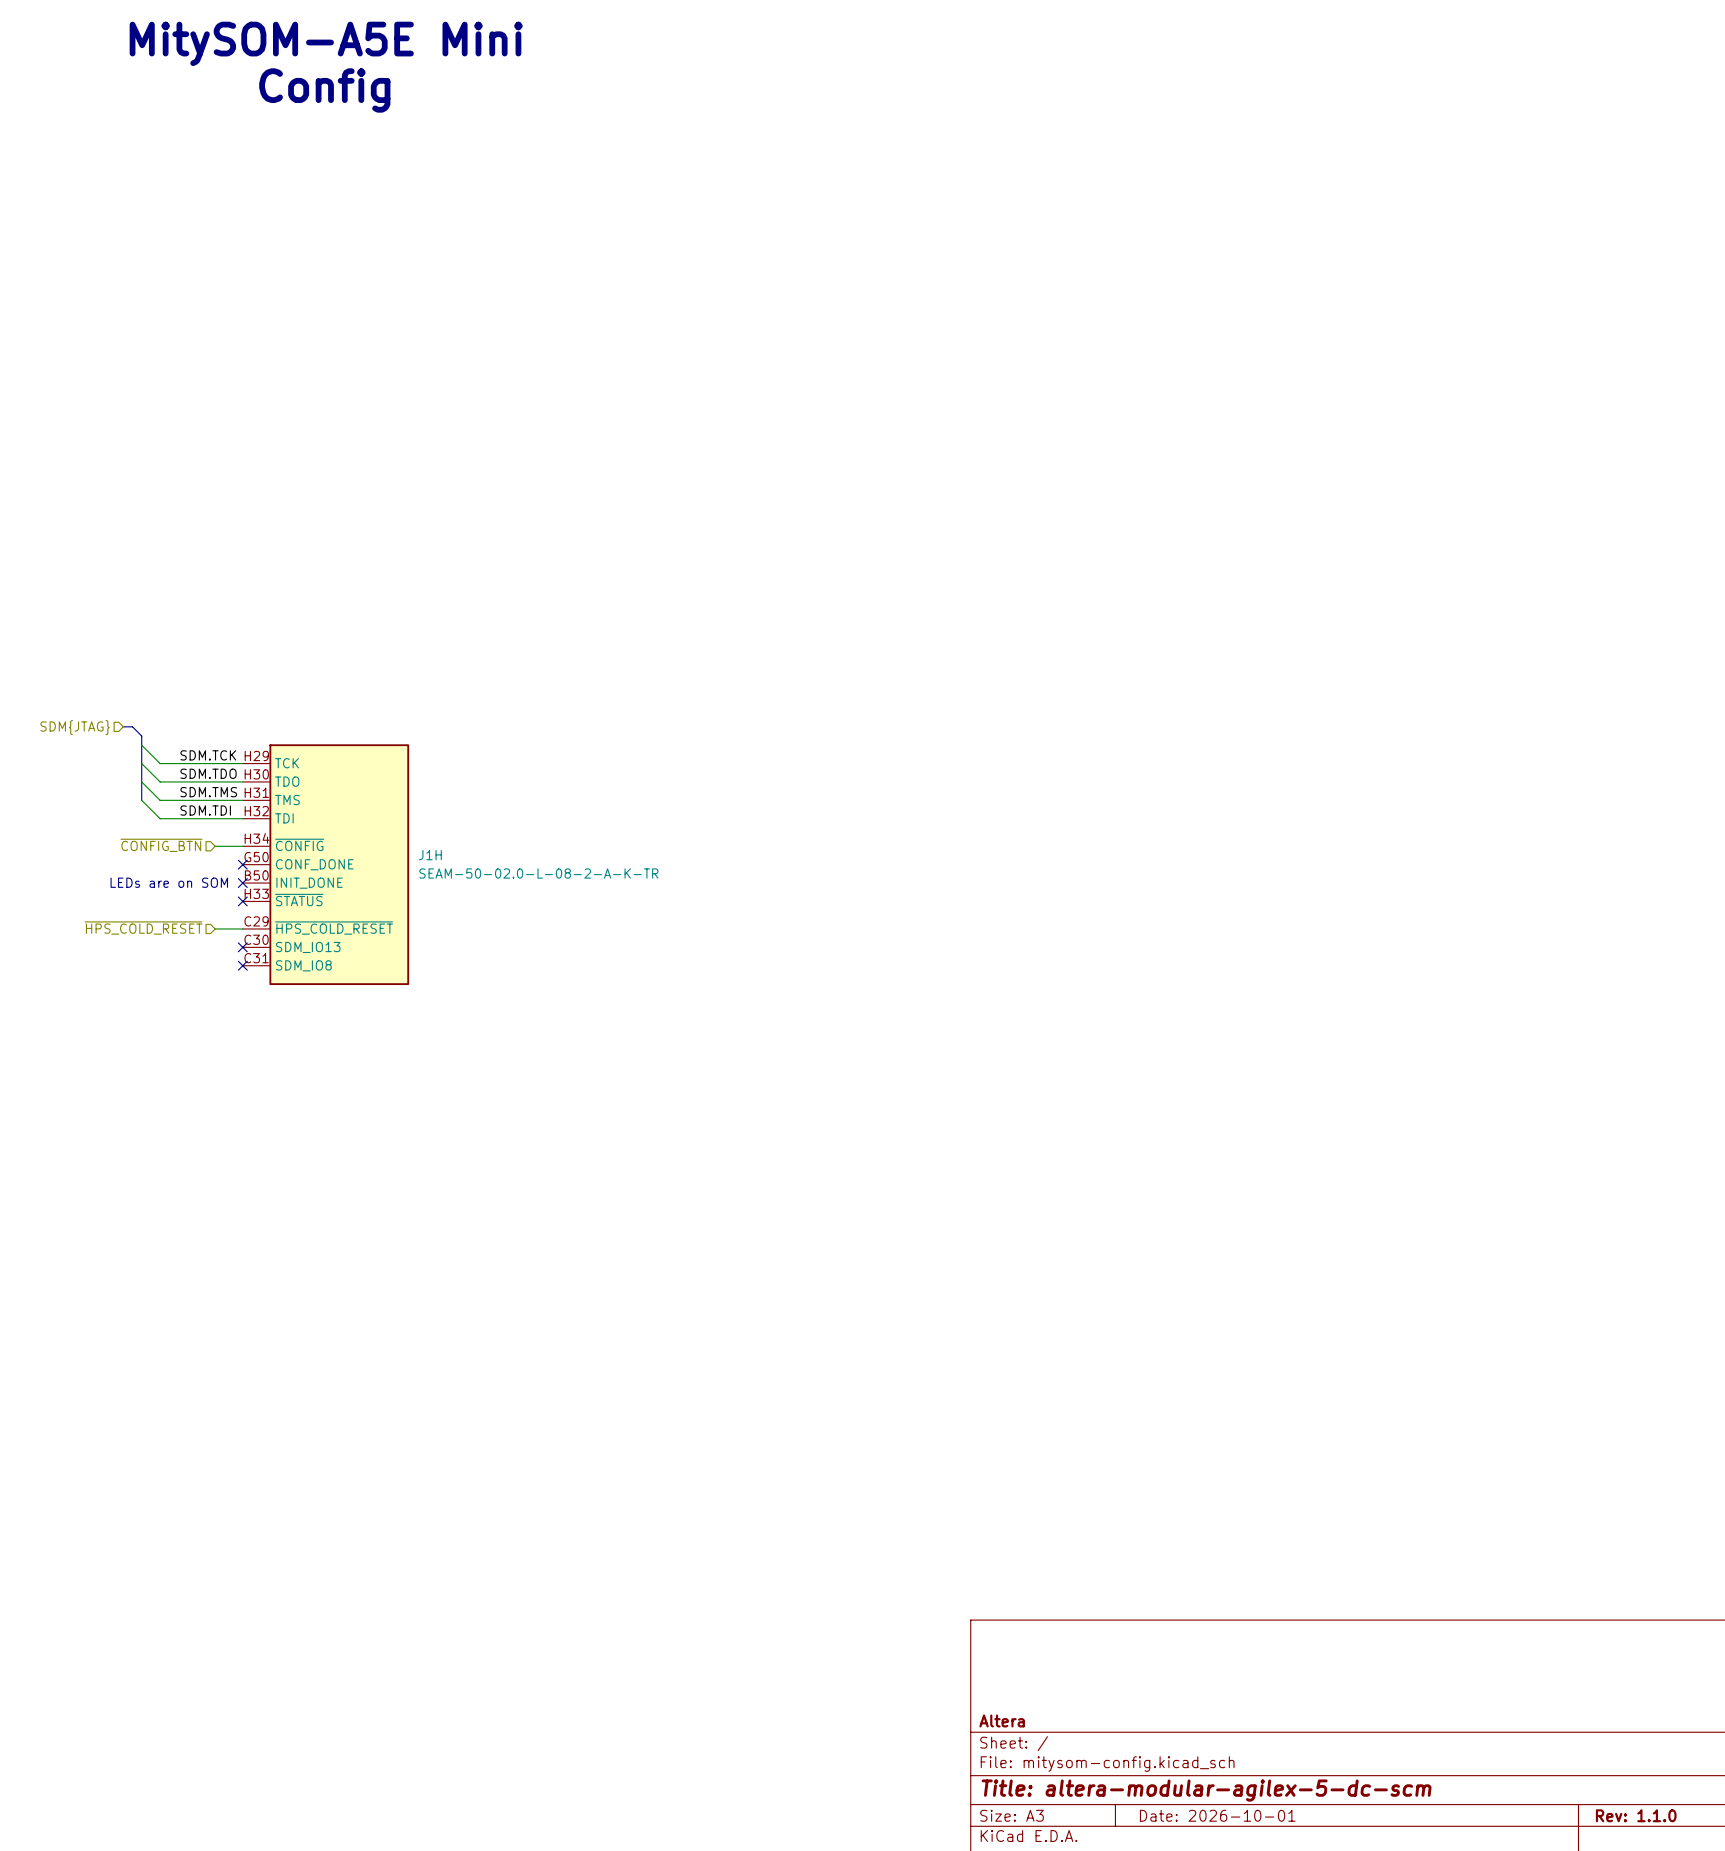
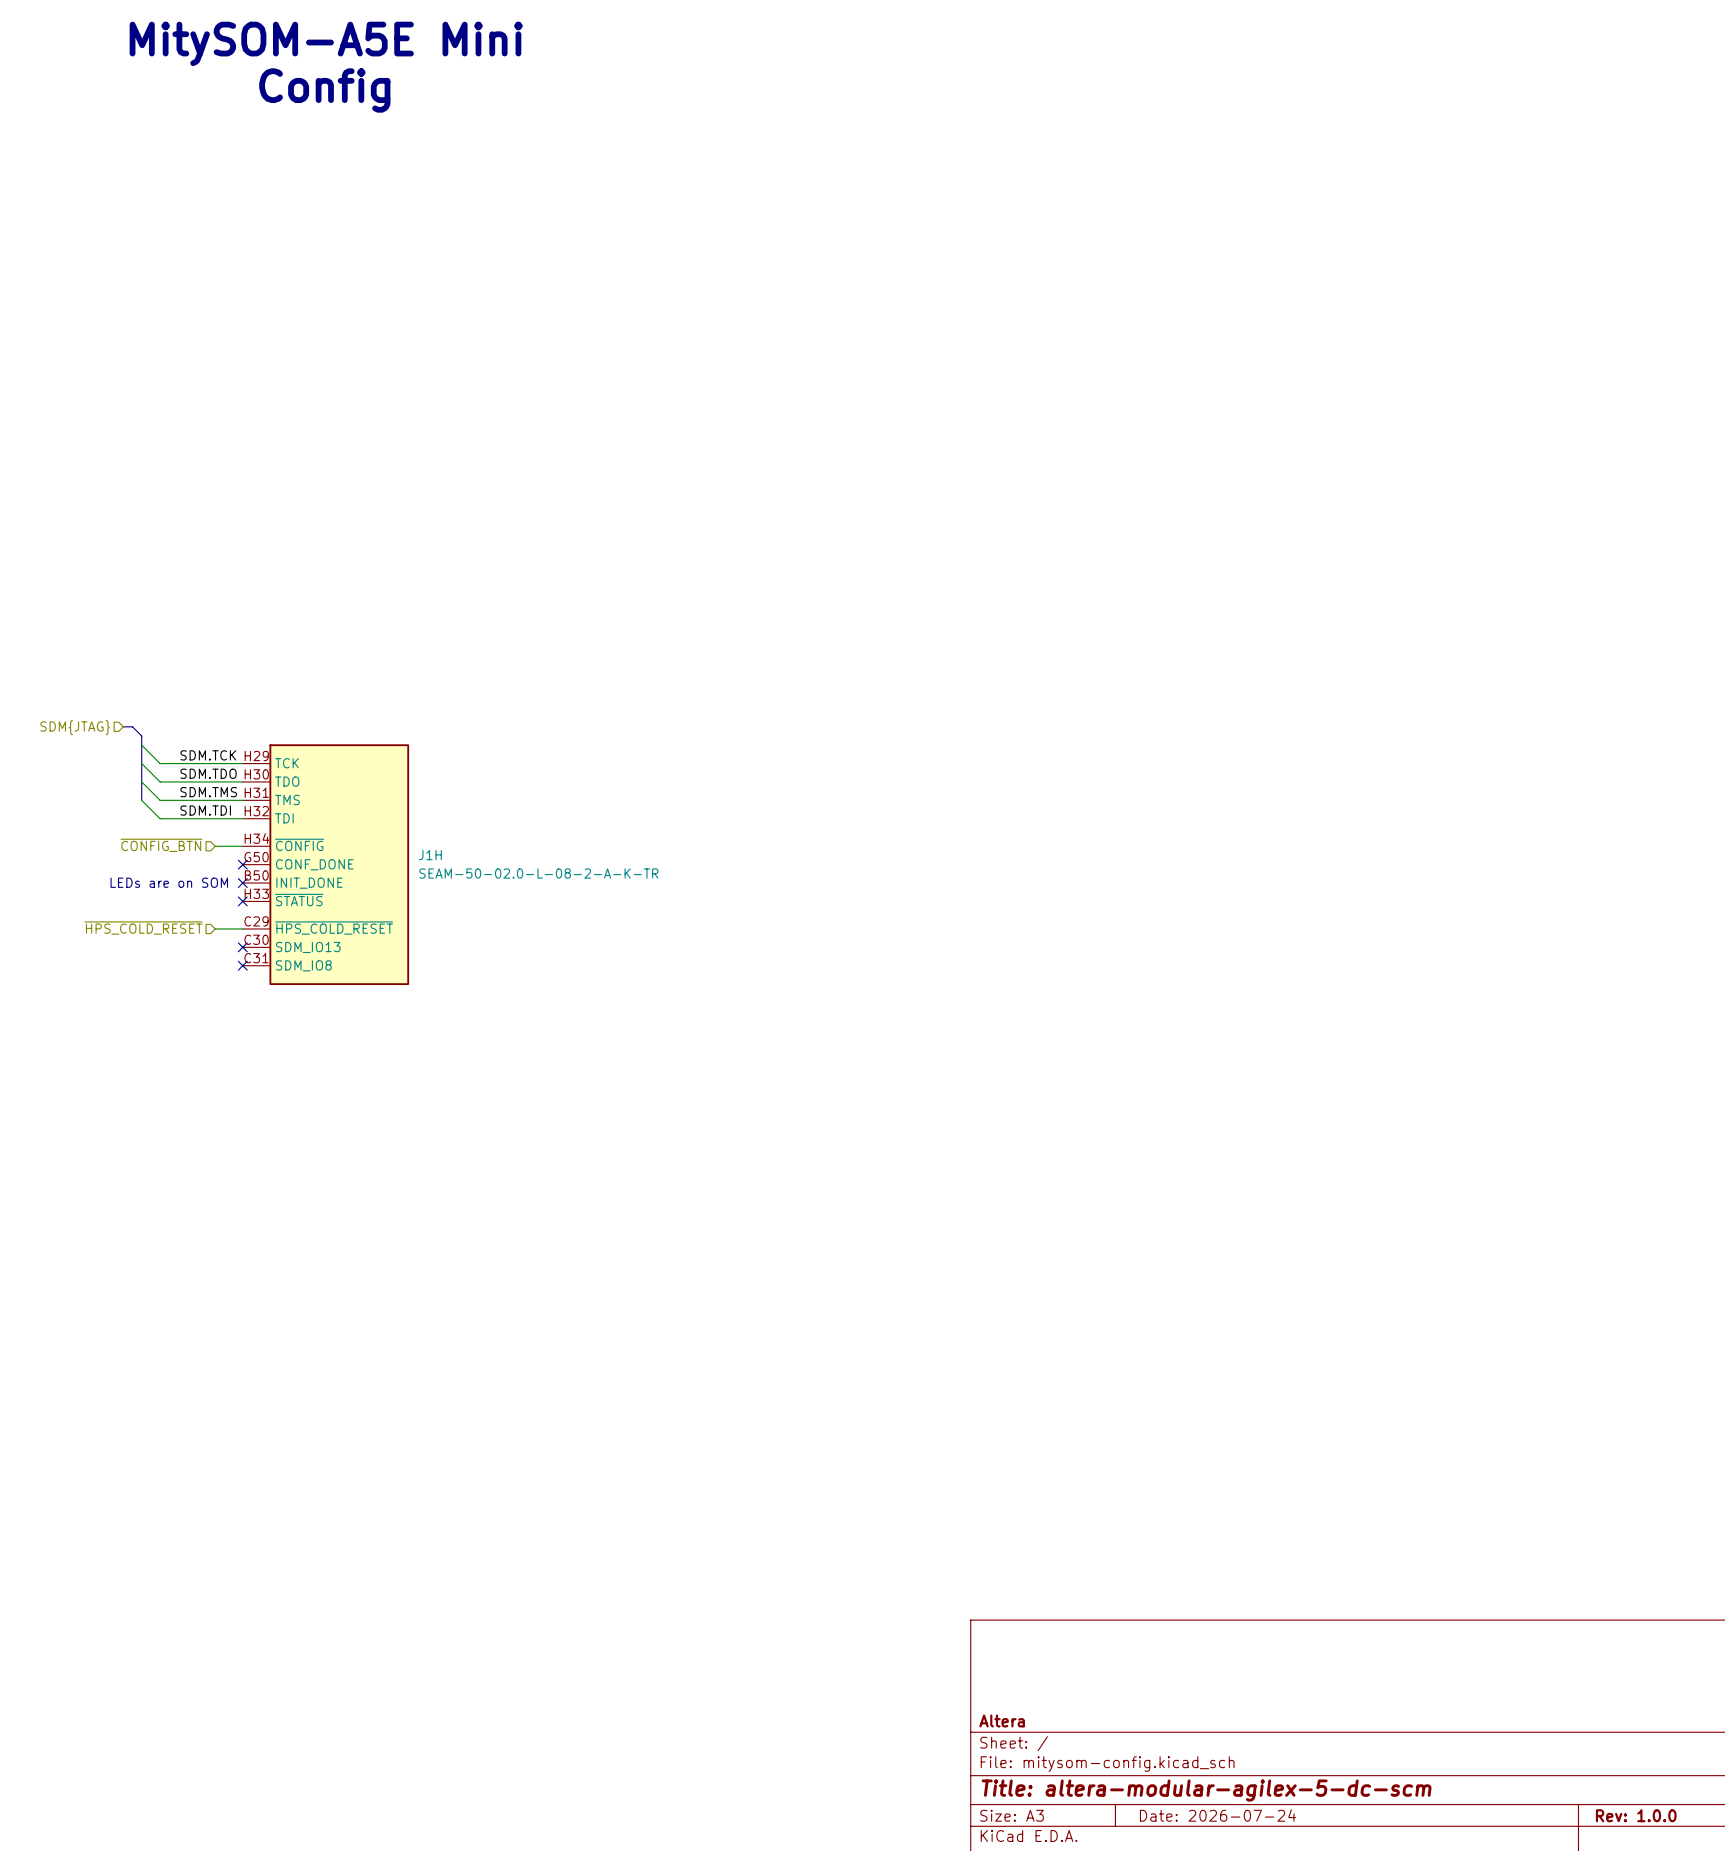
title block: Date: 2026-10-01 (1217, 1815) -> Date: 2026-07-24 (1217, 1815)
title block: Rev: 1.1.0 (1636, 1815) -> Rev: 1.0.0 (1636, 1815)

